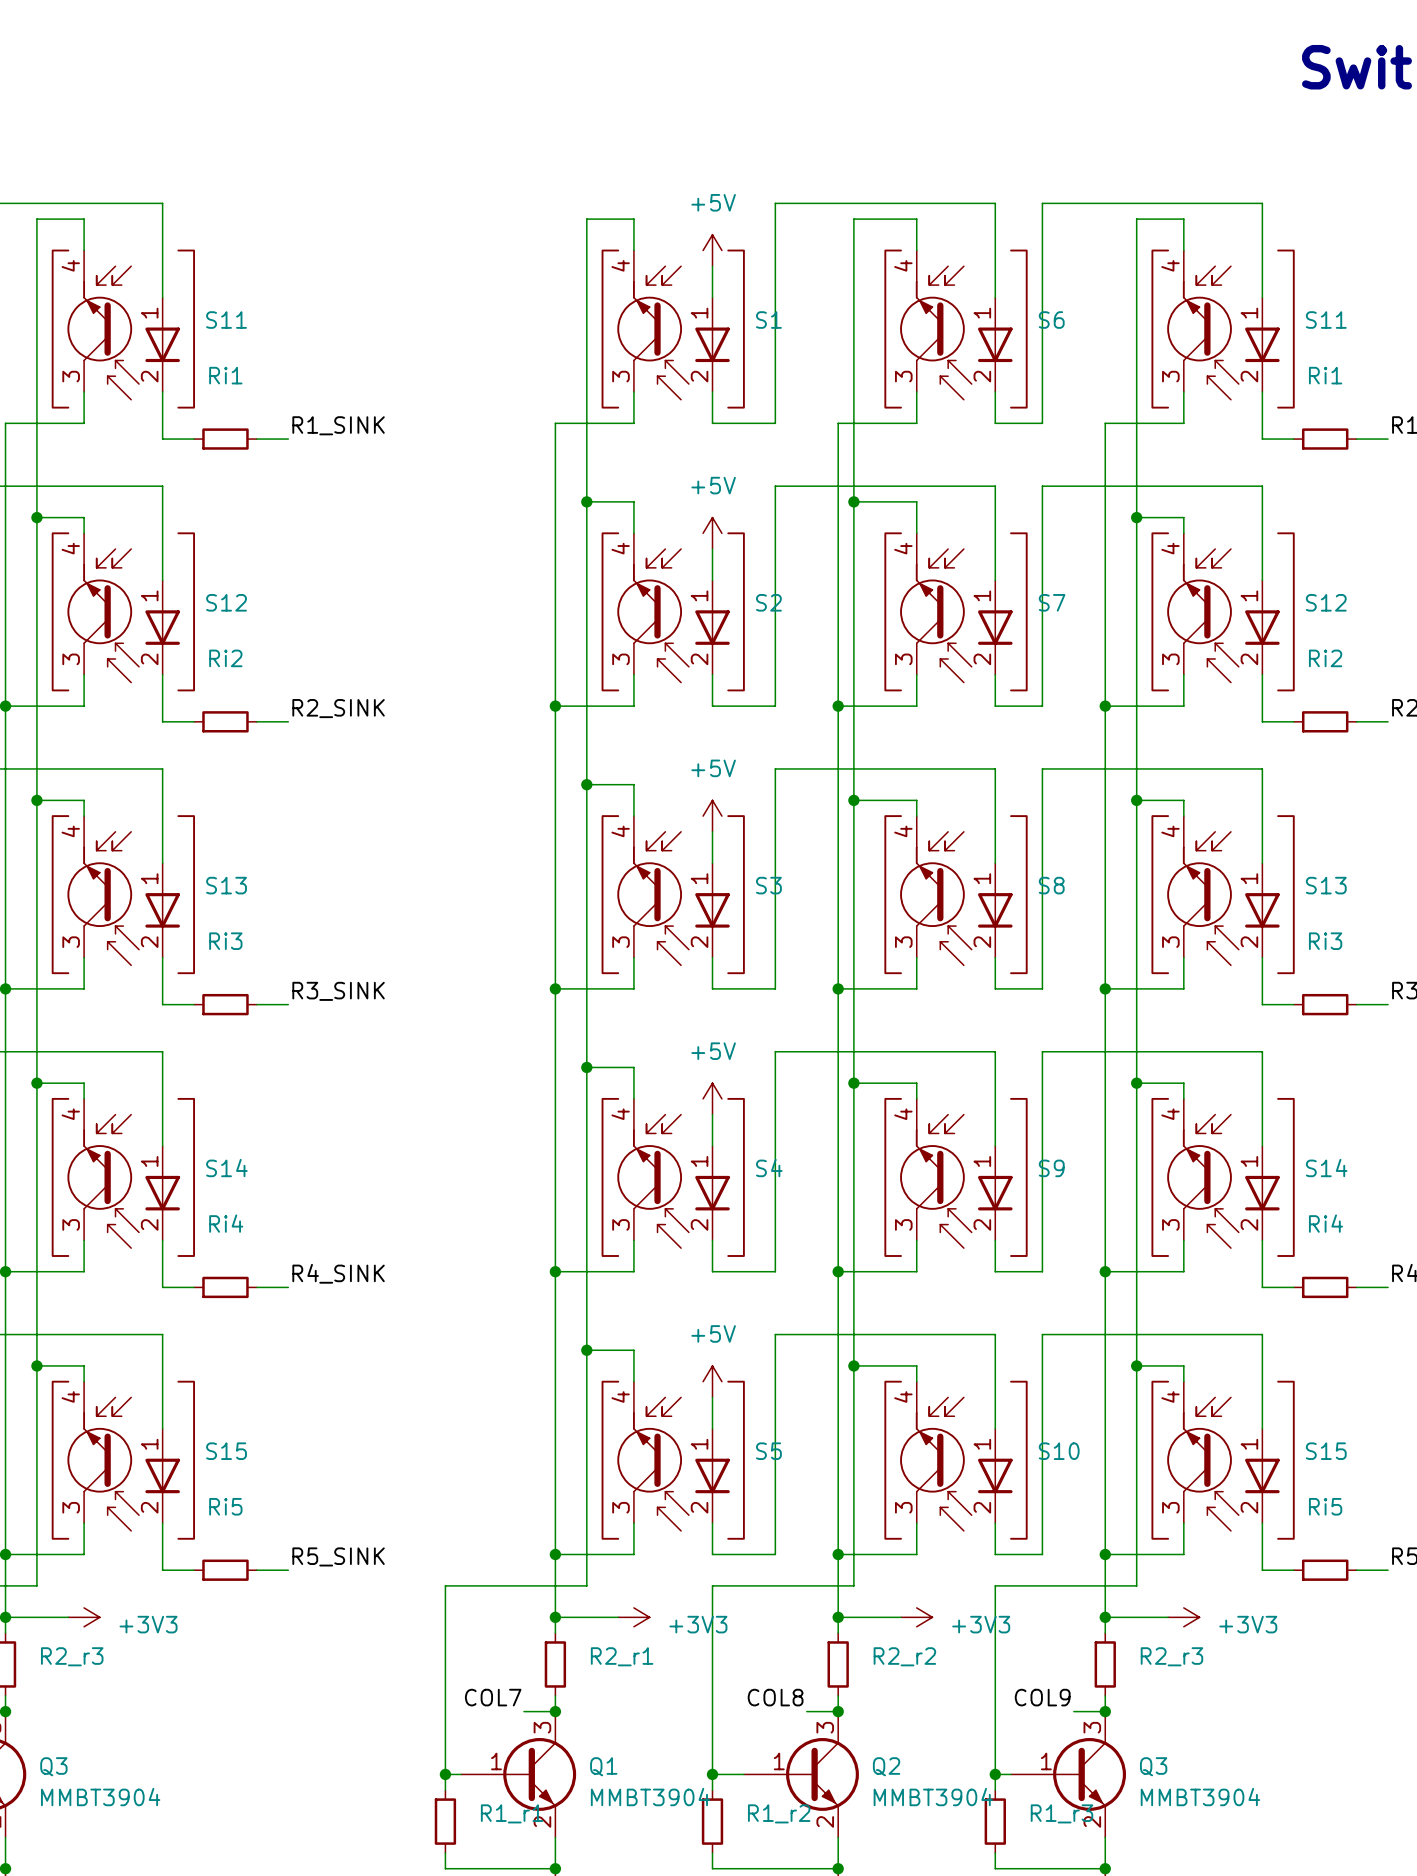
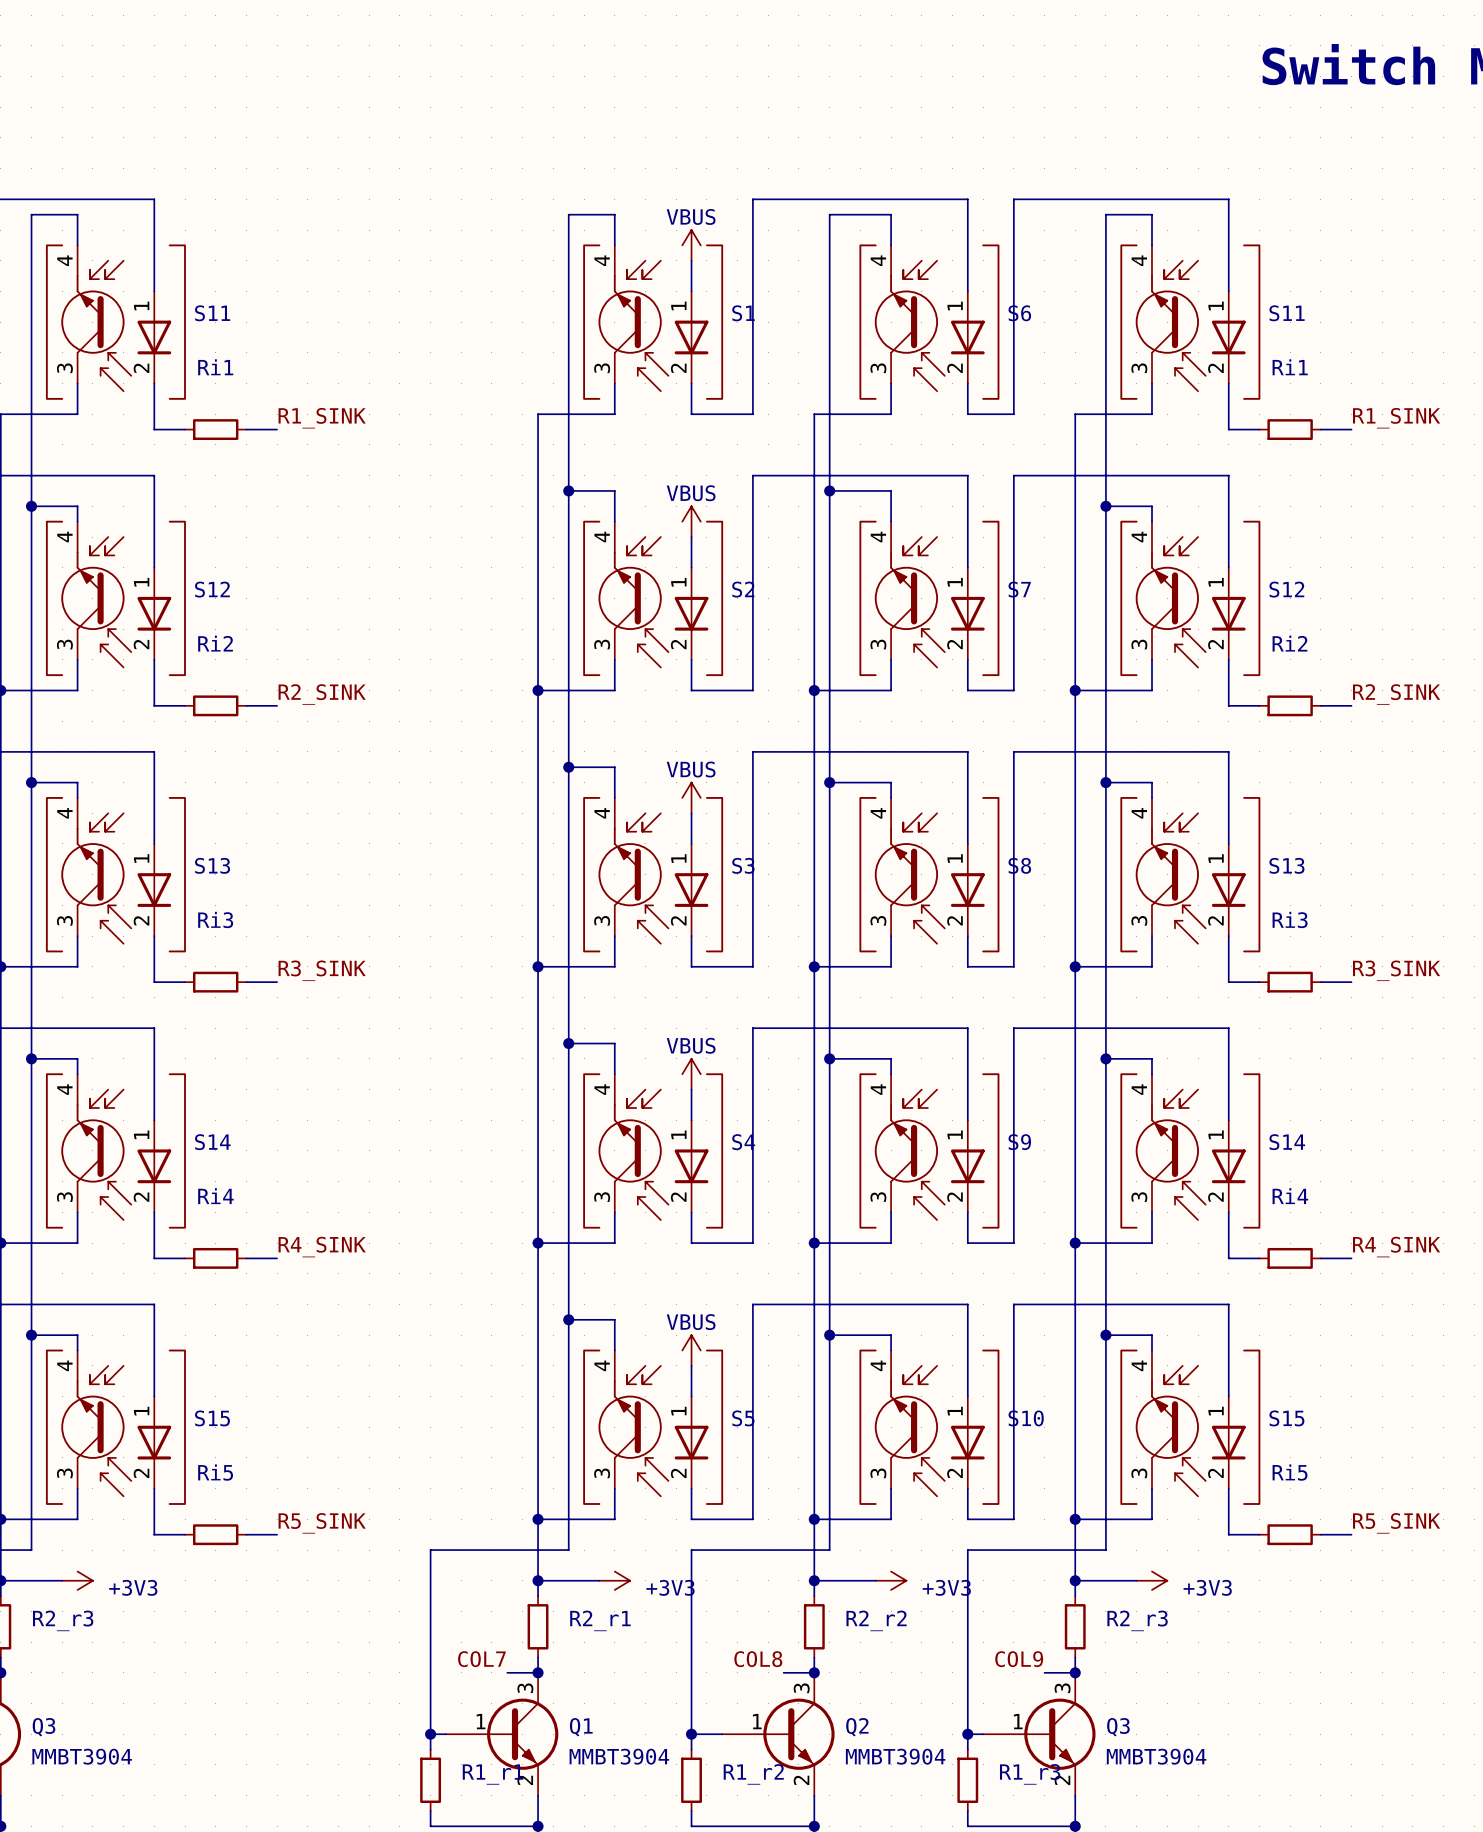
power symbol: +5V (712, 250) -> VBUS (691, 245)
power symbol: +5V (712, 533) -> VBUS (691, 521)
power symbol: +5V (712, 816) -> VBUS (691, 797)
power symbol: +5V (712, 1098) -> VBUS (691, 1074)
power symbol: +5V (712, 1381) -> VBUS (691, 1350)

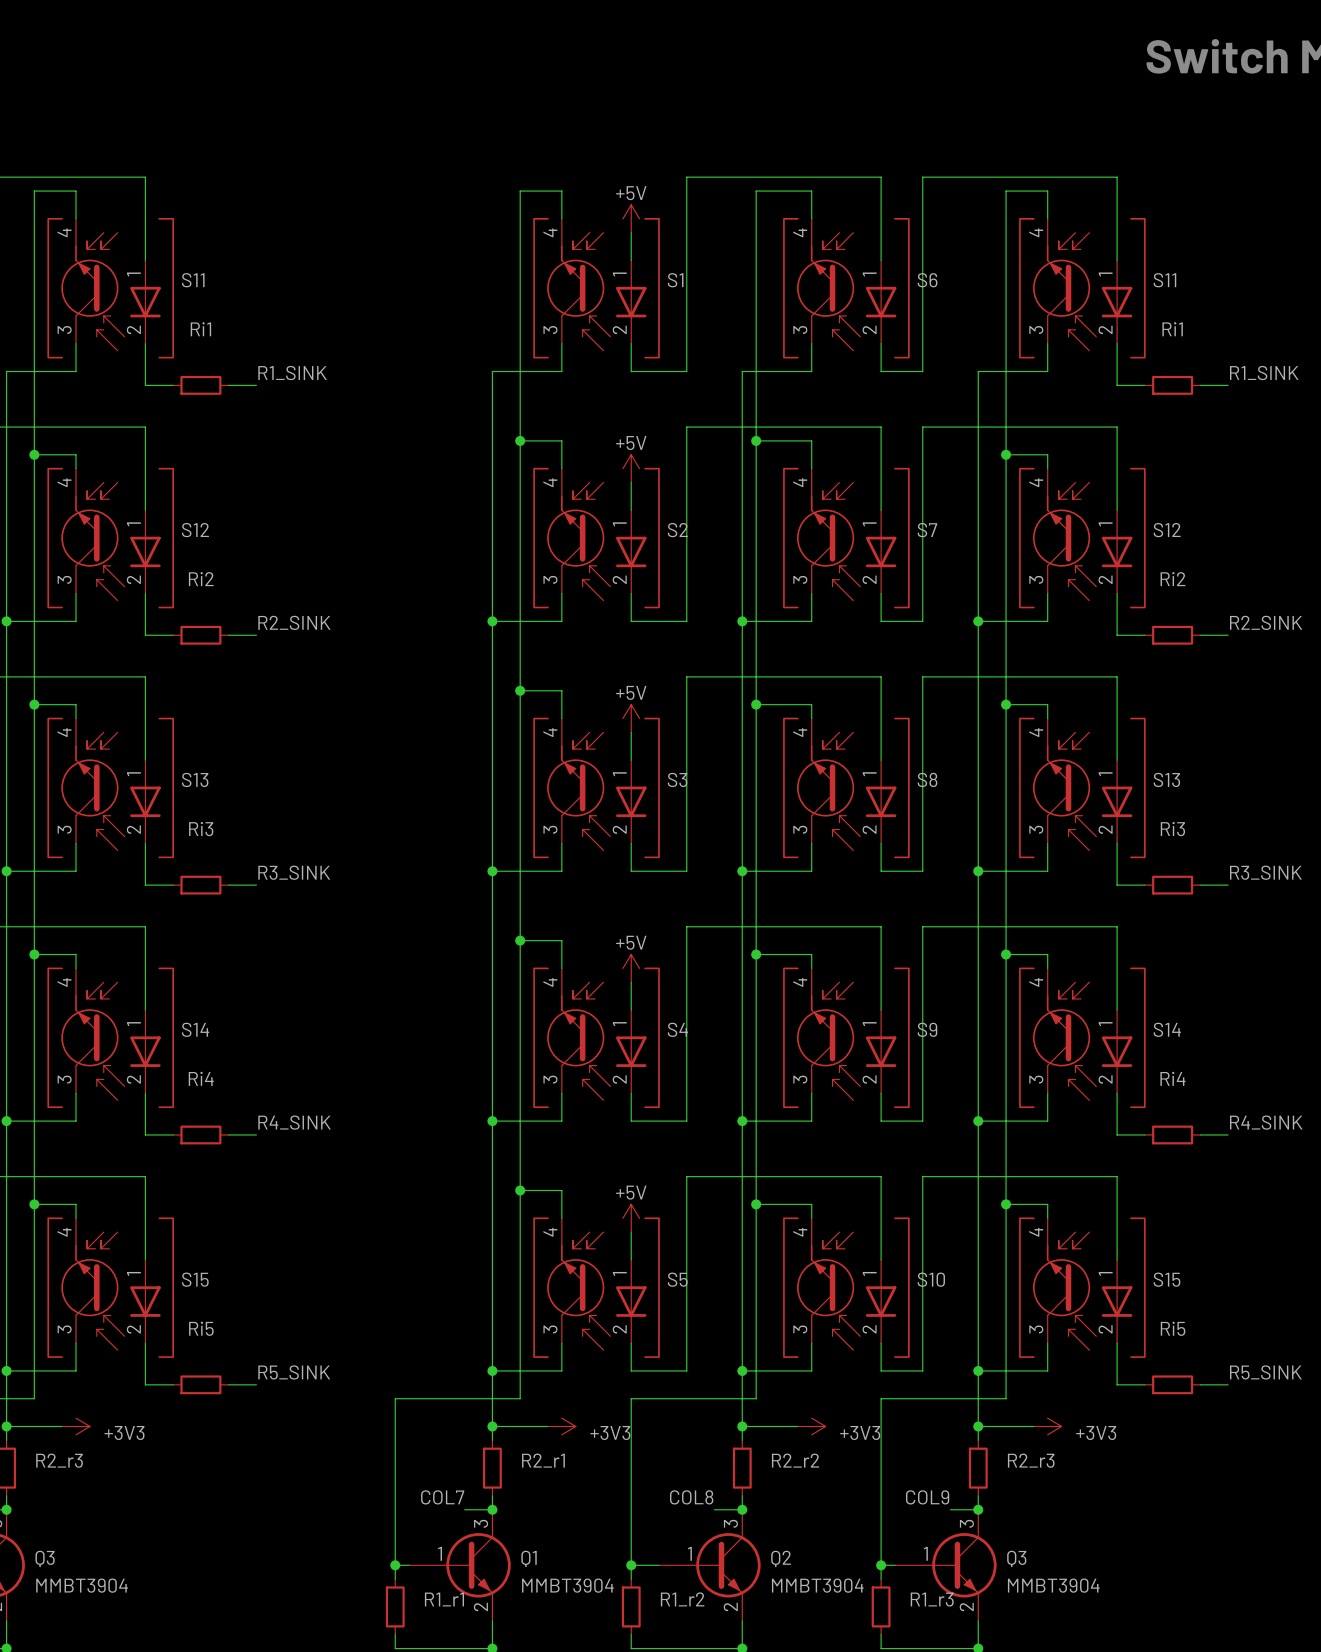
power symbol: VBUS (691, 245) -> +5V (631, 218)
power symbol: VBUS (691, 521) -> +5V (631, 468)
power symbol: VBUS (691, 797) -> +5V (631, 718)
power symbol: VBUS (691, 1074) -> +5V (631, 968)
power symbol: VBUS (691, 1350) -> +5V (631, 1218)

